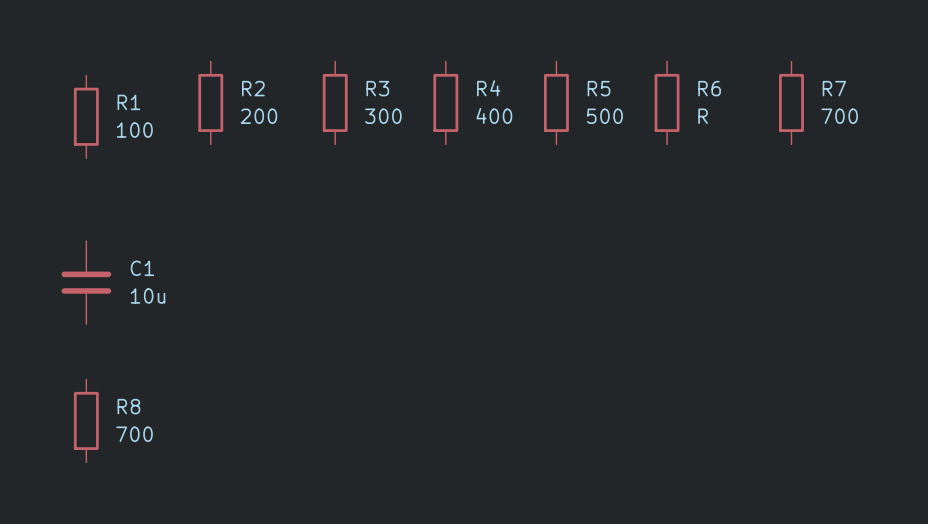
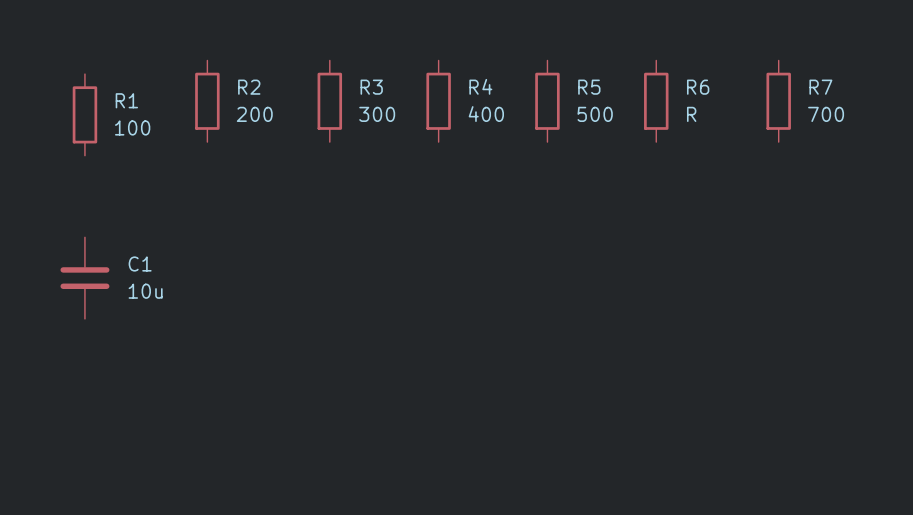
R8: 700 (86, 420) -> none

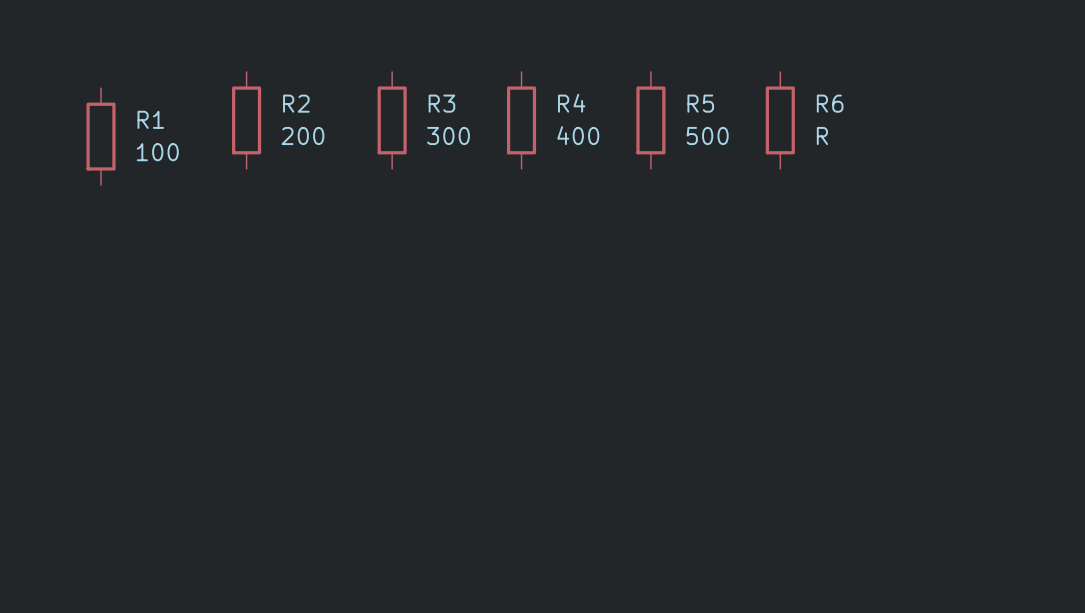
R7: 700 (778, 101) -> none
C1: 10u (84, 278) -> none

